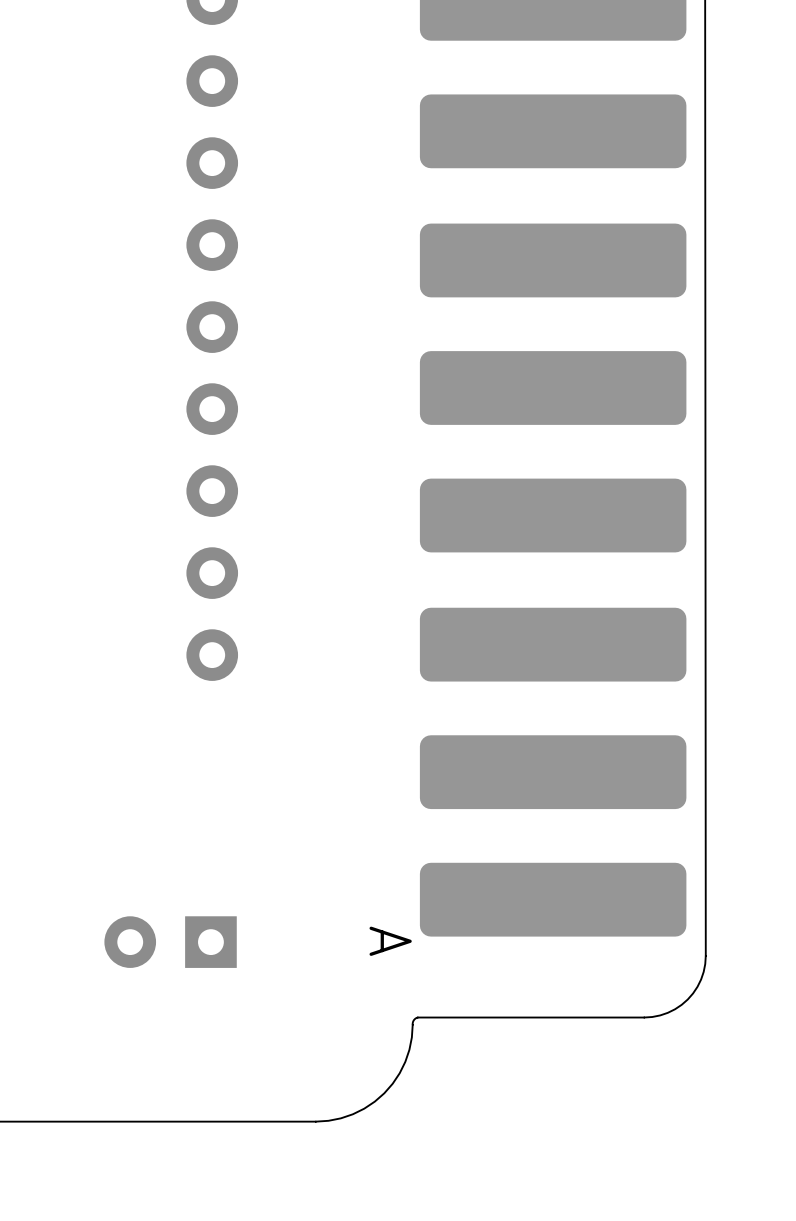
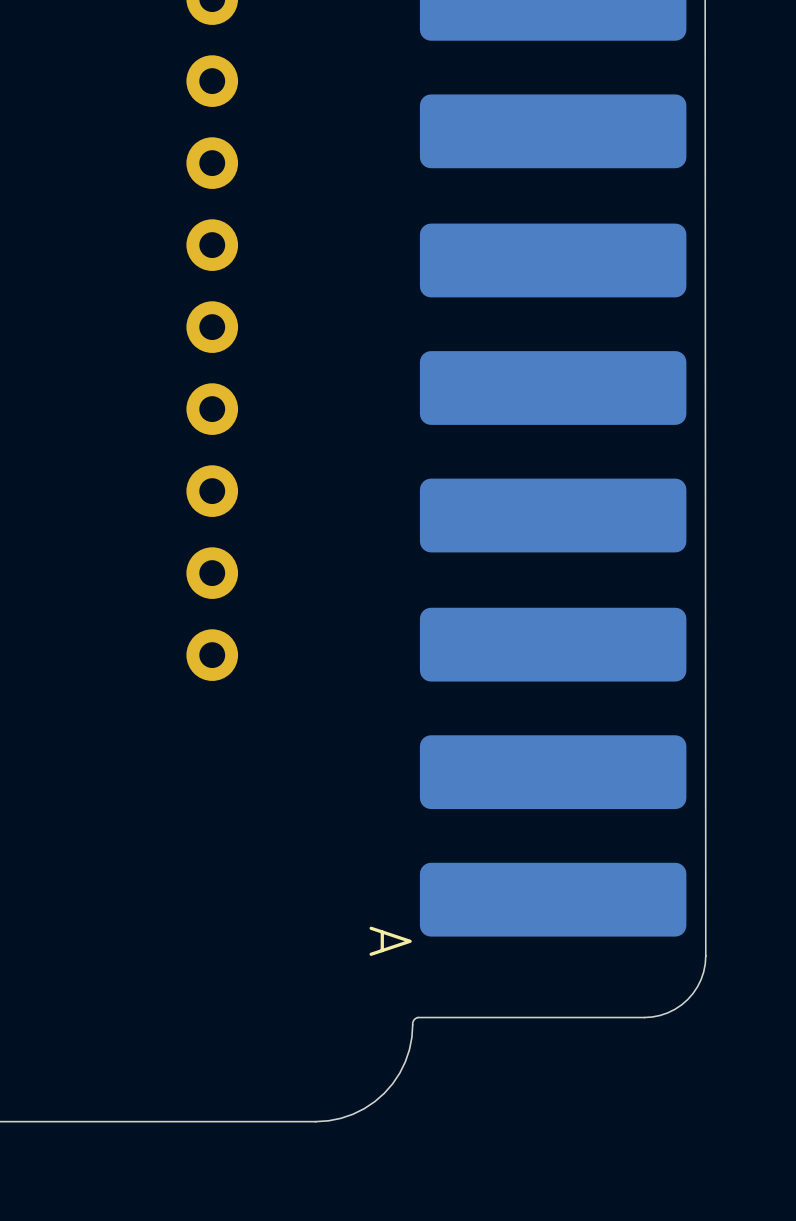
part: (170, 942) -> none

